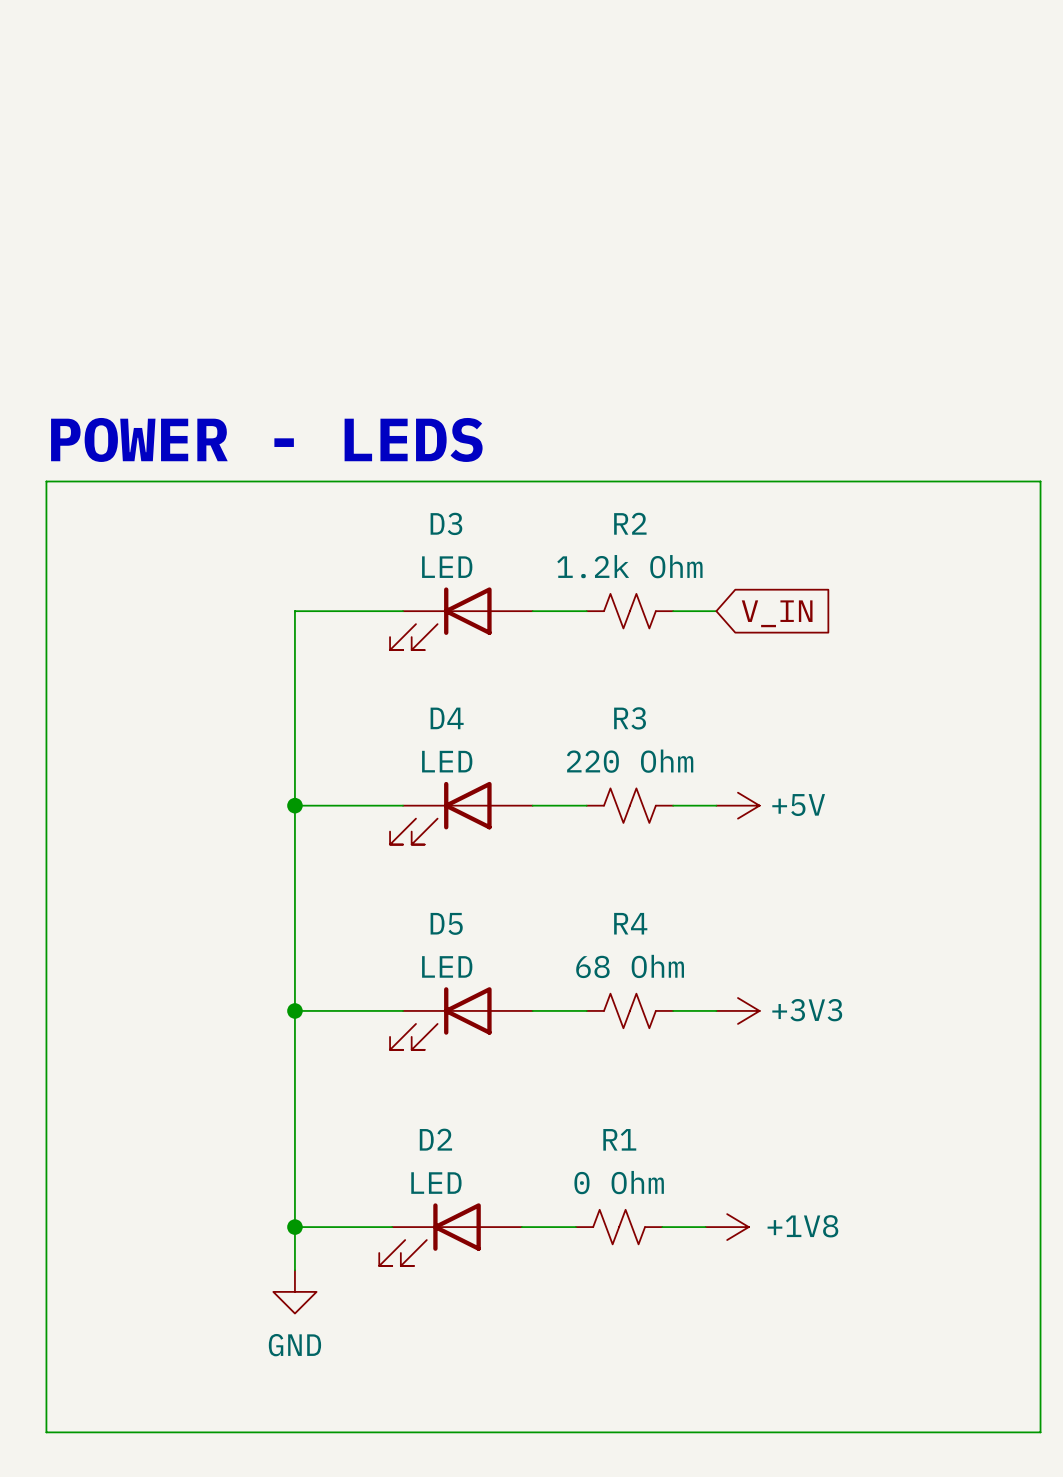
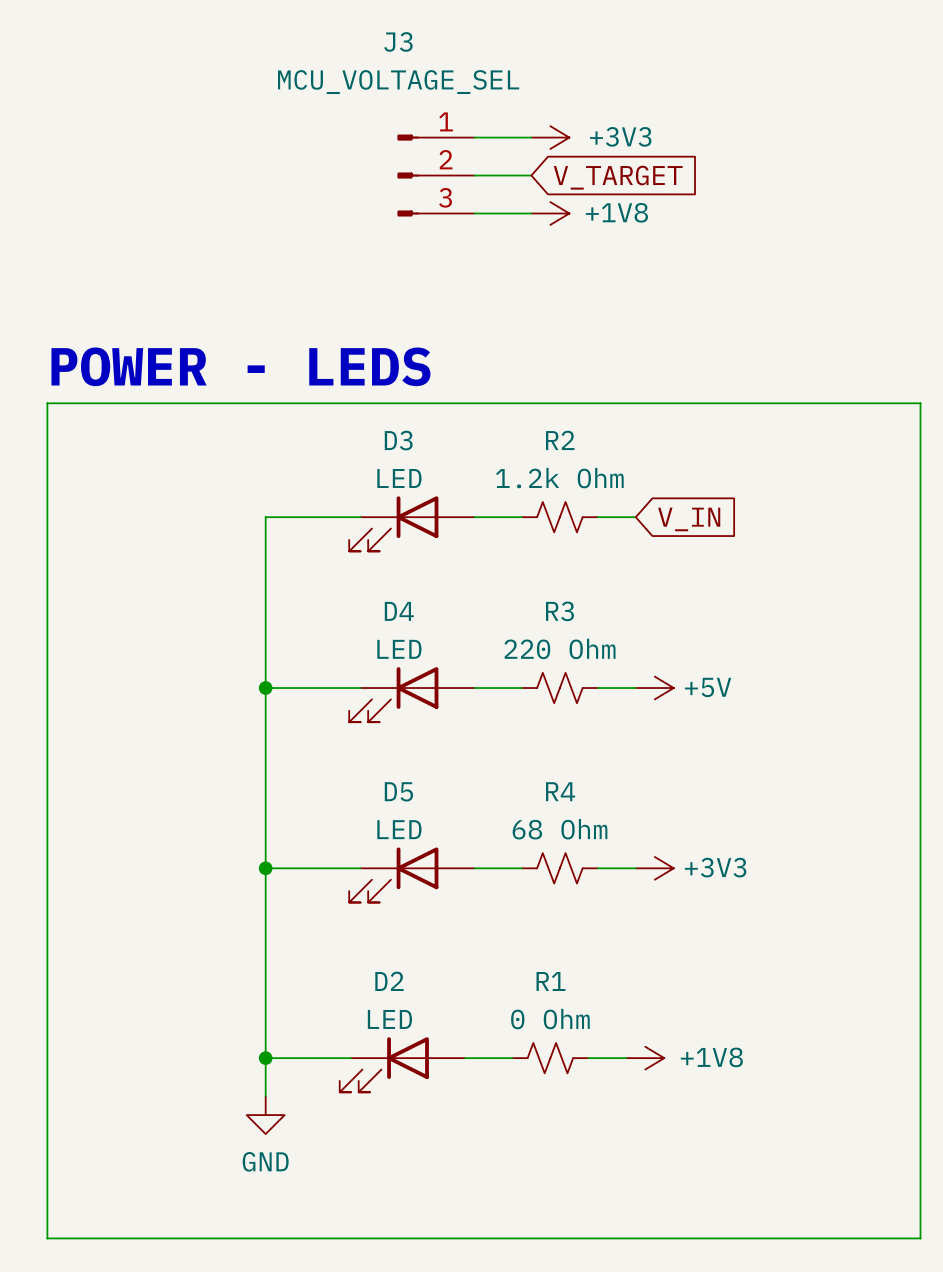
wire: none -> (474, 137) (531, 137)
power symbol: none -> +3V3 (550, 137)
J3: none -> MCU_VOLTAGE_SEL (435, 175)
wire: none -> (474, 175) (531, 175)
global label: none -> V_TARGET (618, 177)
wire: none -> (474, 213) (531, 213)
power symbol: none -> +1V8 (550, 213)

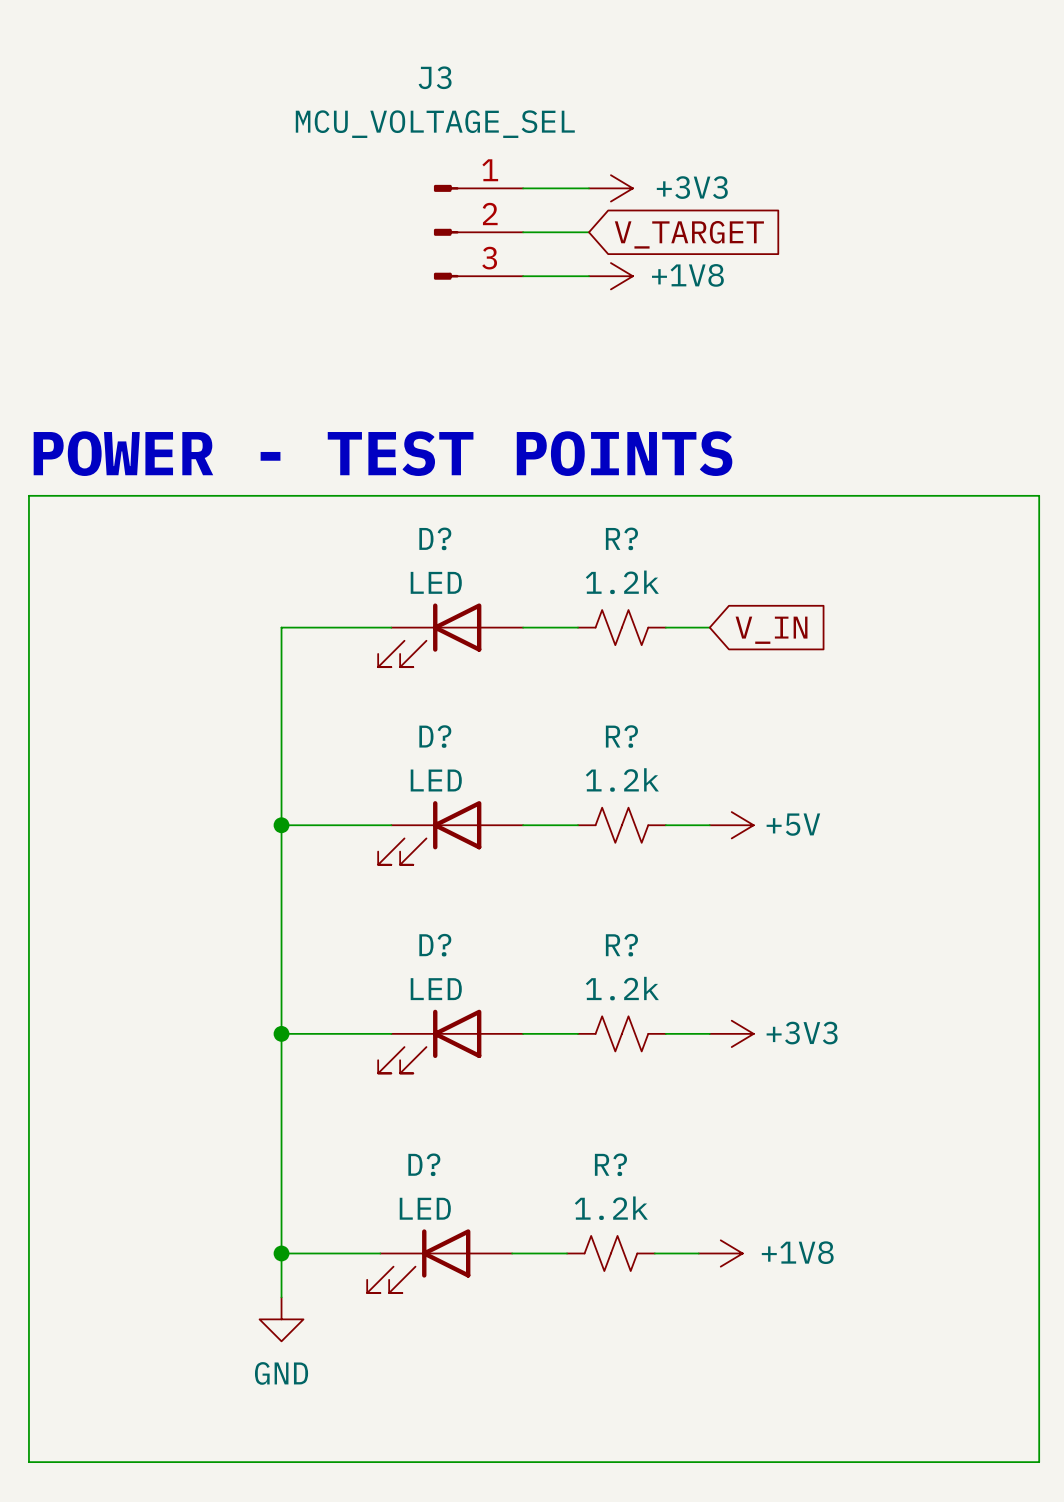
text: POWER - LEDS (240, 366) -> POWER - TEST POINTS (383, 453)
D3 name: D3 (398, 440) -> D? (435, 538)
R2 name: R2 (560, 440) -> R? (621, 538)
R2 value: 1.2k Ohm (559, 478) -> 1.2k (622, 582)
D4 name: D4 (399, 611) -> D? (435, 736)
R3 name: R3 (559, 611) -> R? (621, 736)
R3 value: 220 Ohm (560, 648) -> 1.2k (622, 779)
D5 name: D5 (398, 791) -> D? (435, 945)
R4 name: R4 (560, 791) -> R? (621, 945)
R4 value: 68 Ohm (560, 829) -> 1.2k (622, 988)
D2 name: D2 (389, 981) -> D? (424, 1164)
R1 name: R1 (550, 981) -> R? (610, 1164)
R1 value: 0 Ohm (550, 1019) -> 1.2k (611, 1208)

